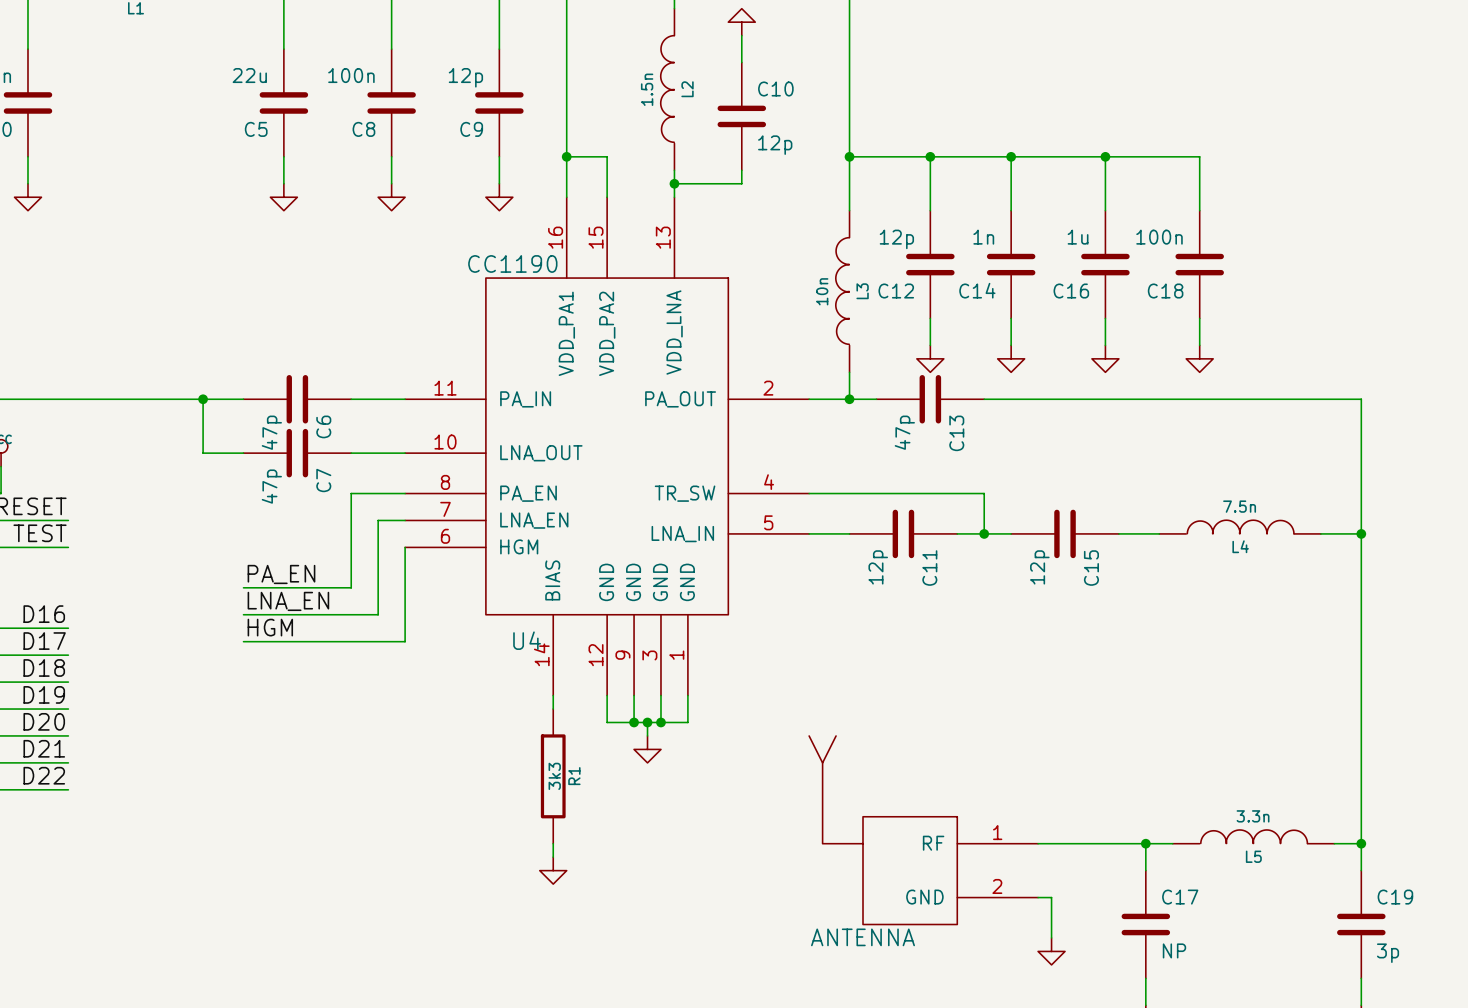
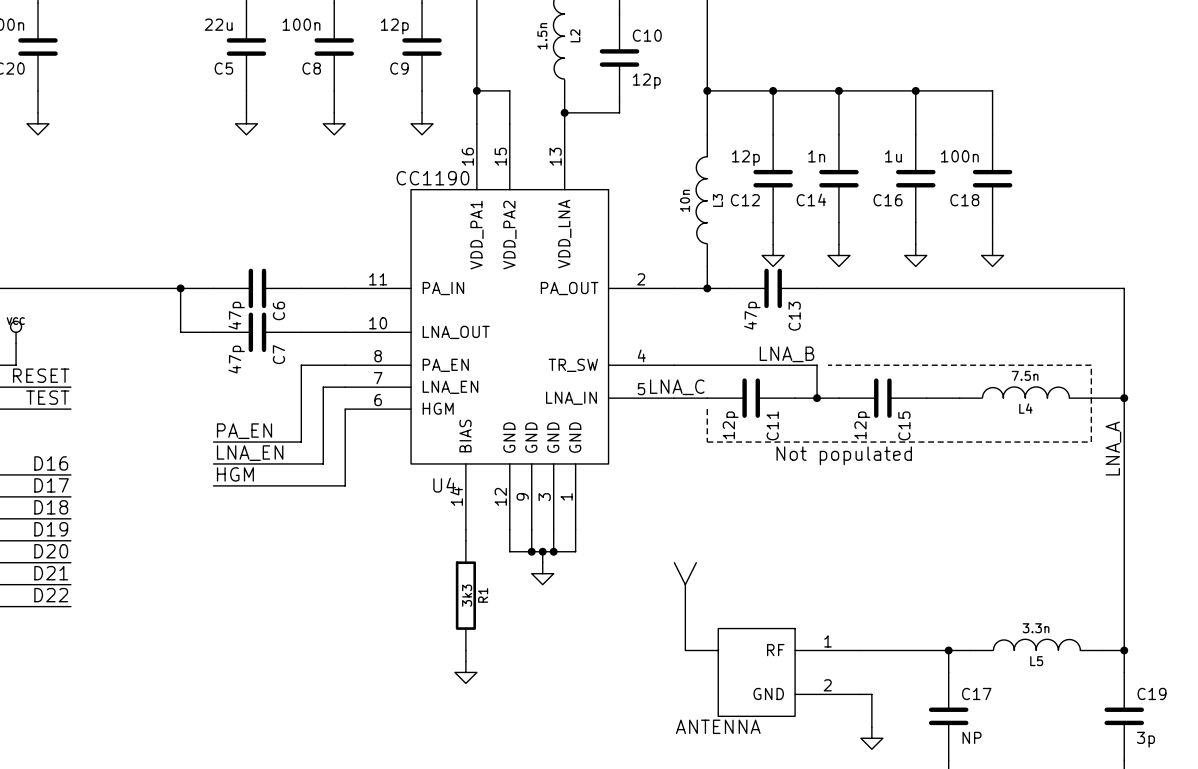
label: none -> LNA_B (786, 354)
line: none -> (827, 365) (1091, 365) (1091, 442) (707, 442) (707, 409)
label: none -> LNA_C (677, 387)
label: none -> LNA_A (1113, 448)
text: none -> Not populated (844, 455)

